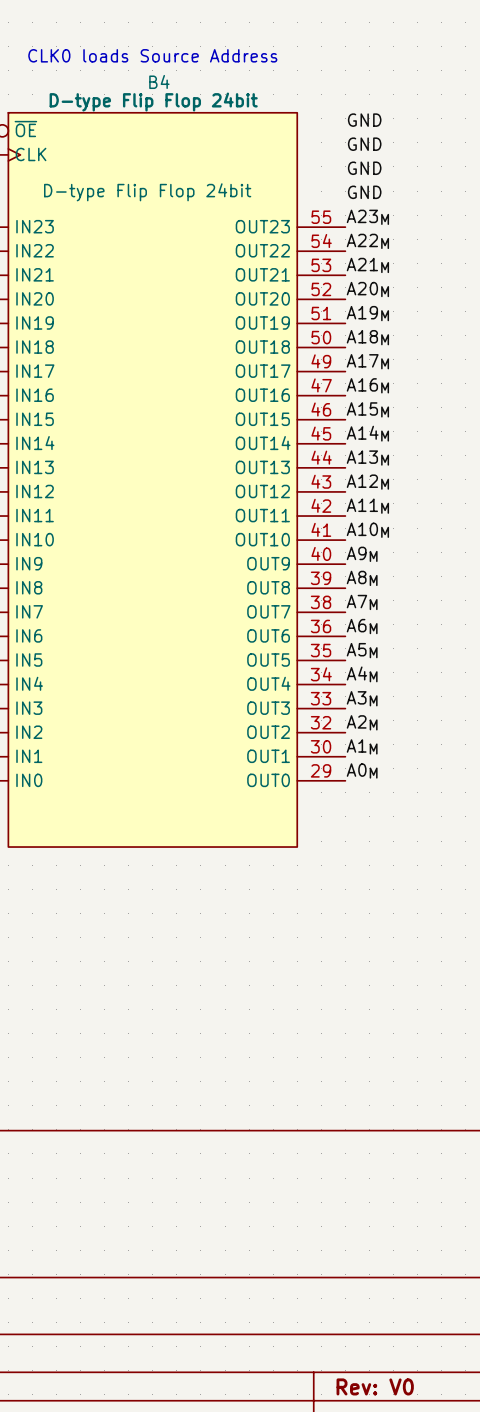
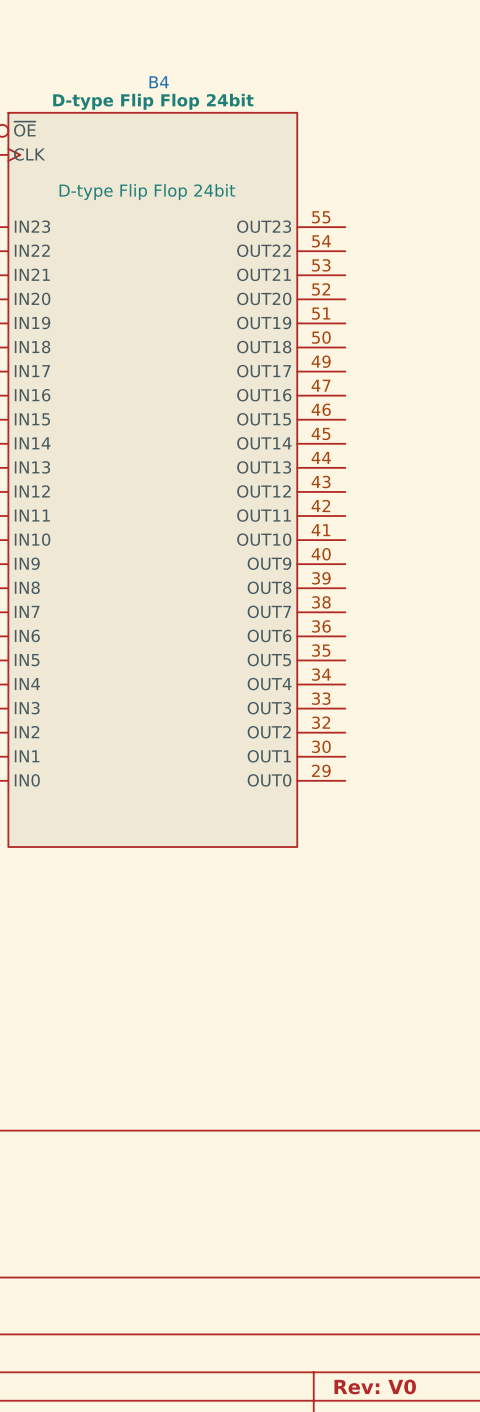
text: CLK0 loads Source Address (152, 55) -> none
label: GND (364, 120) -> none
label: GND (364, 144) -> none
label: GND (364, 168) -> none
label: GND (364, 192) -> none
label: A23M (367, 217) -> none
label: A22M (367, 241) -> none
label: A21M (367, 265) -> none
label: A20M (367, 289) -> none
label: A19M (367, 313) -> none
label: A18M (367, 337) -> none
label: A17M (367, 361) -> none
label: A16M (367, 385) -> none
label: A15M (367, 409) -> none
label: A14M (367, 433) -> none
label: A13M (367, 458) -> none
label: A12M (367, 482) -> none
label: A11M (367, 506) -> none
label: A10M (367, 530) -> none
label: A9M (362, 554) -> none
label: A8M (362, 578) -> none
label: A7M (362, 602) -> none
label: A6M (362, 626) -> none
label: A5M (362, 650) -> none
label: A4M (362, 674) -> none
label: A3M (362, 698) -> none
label: A2M (362, 722) -> none
label: A1M (362, 746) -> none
label: A0M (362, 770) -> none

